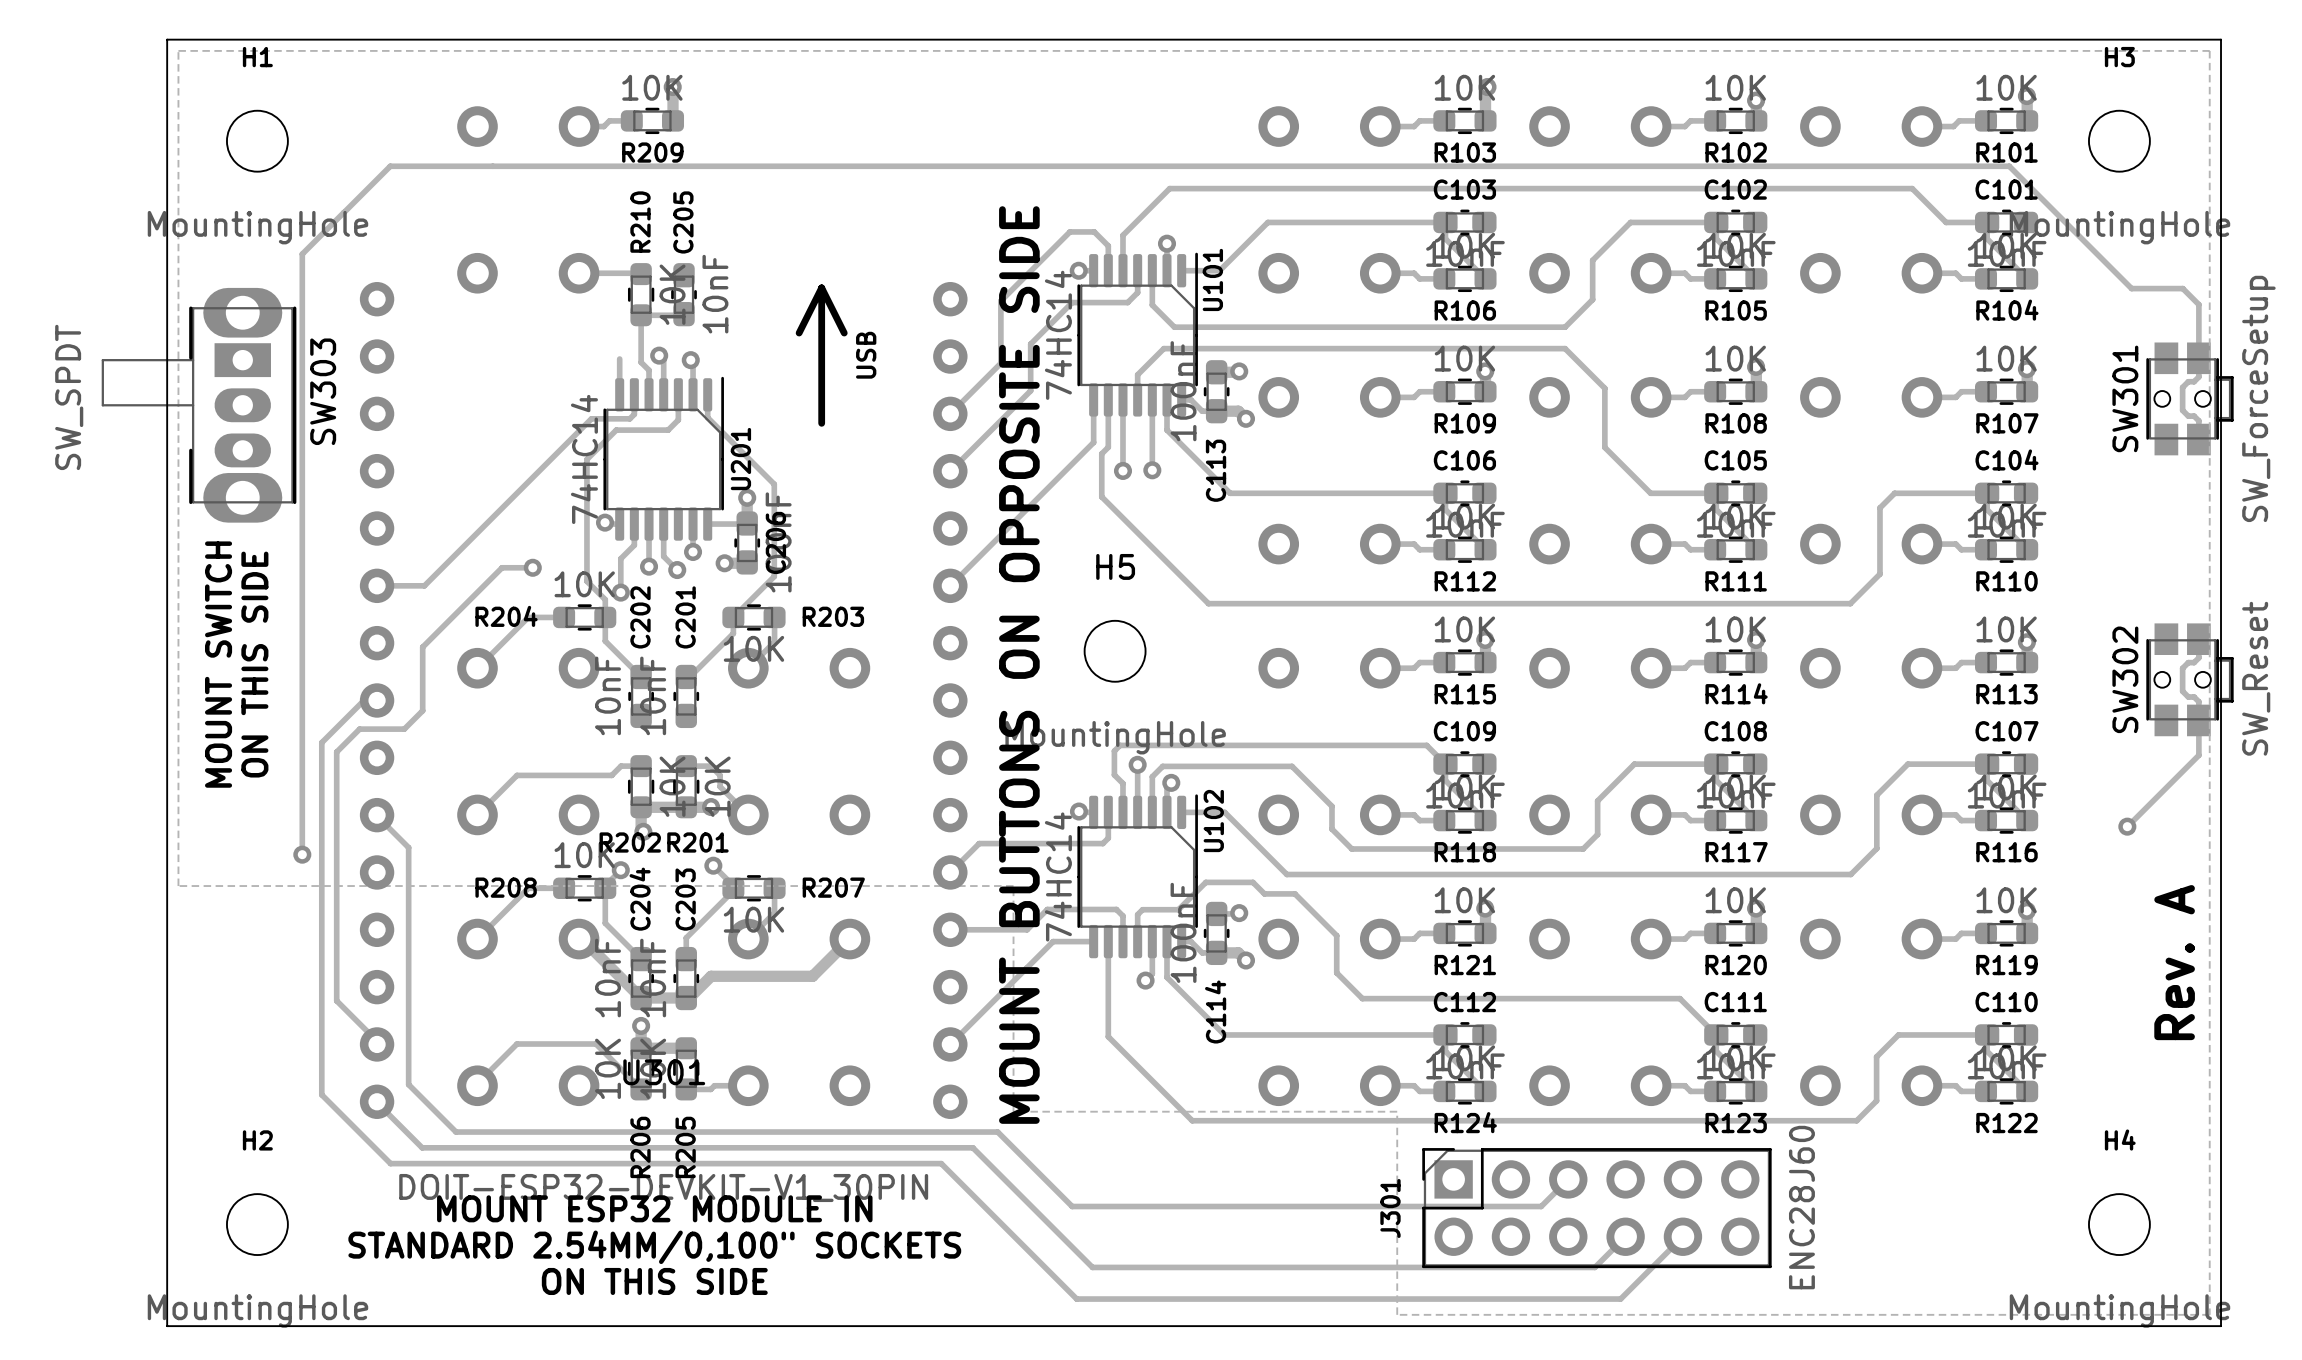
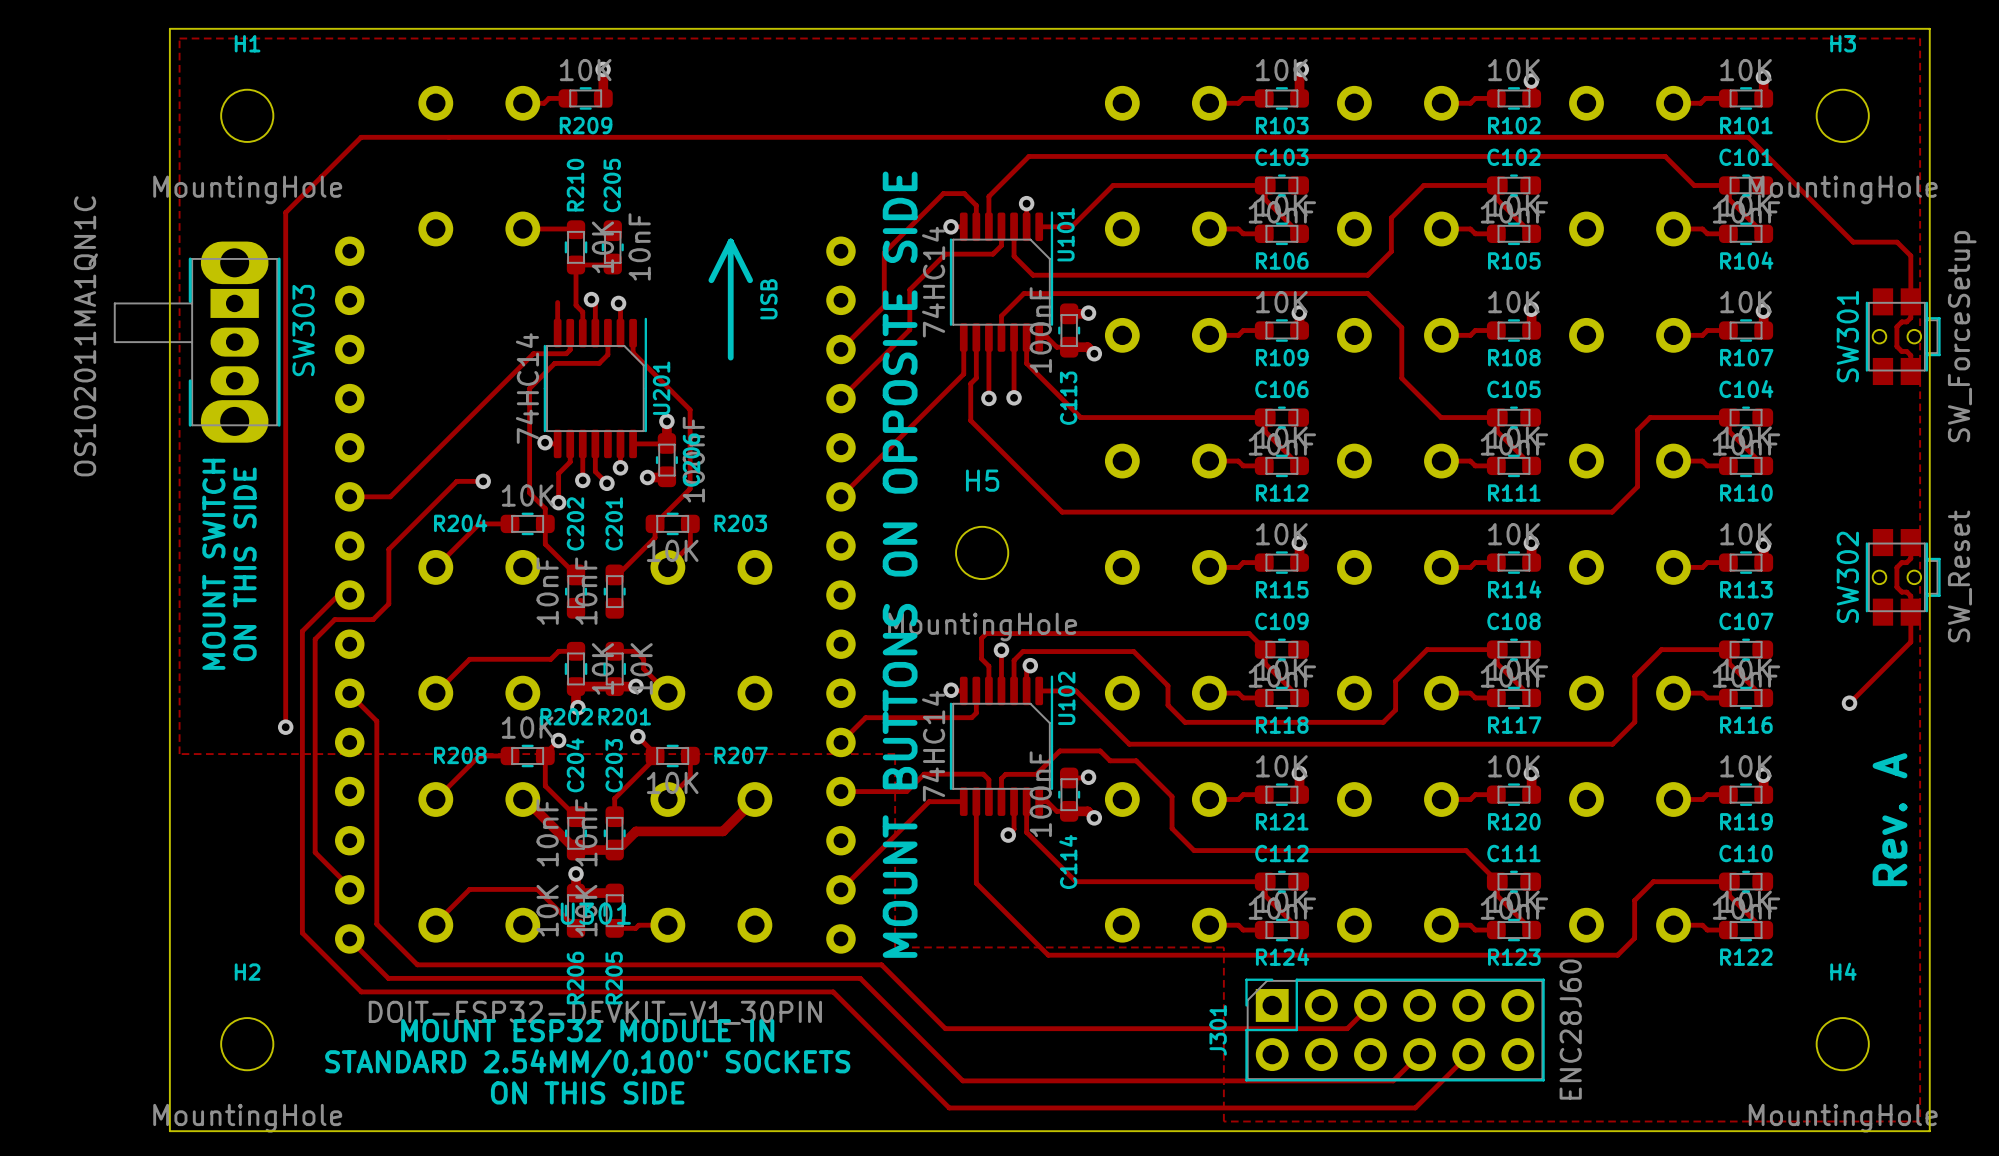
SW303 value: SW_SPDT (69, 397) -> OS102011MA1QN1C (85, 336)

